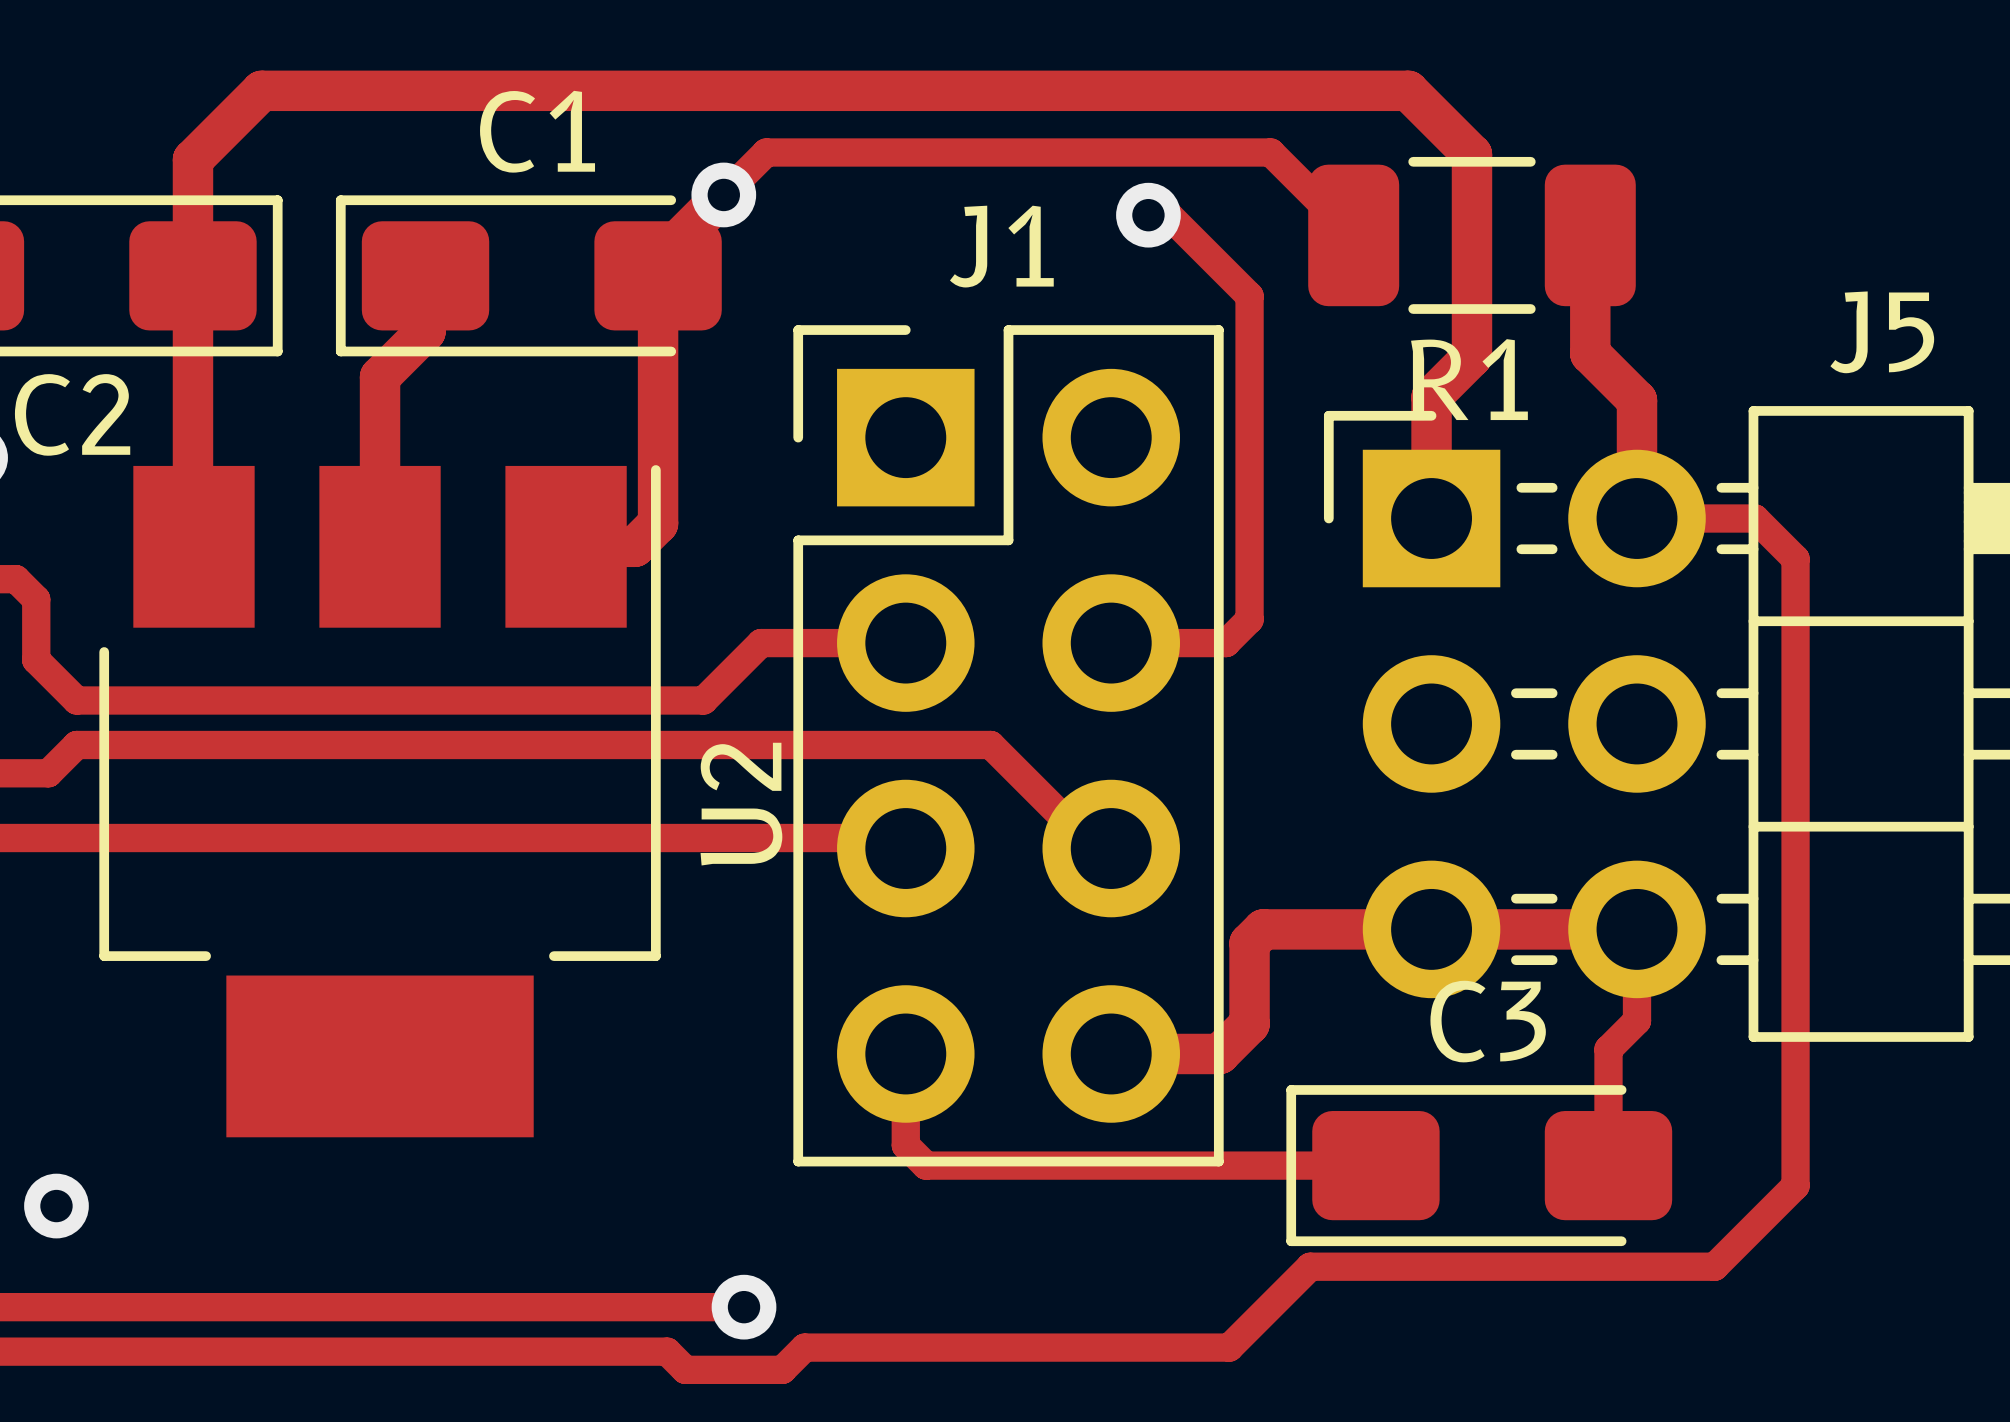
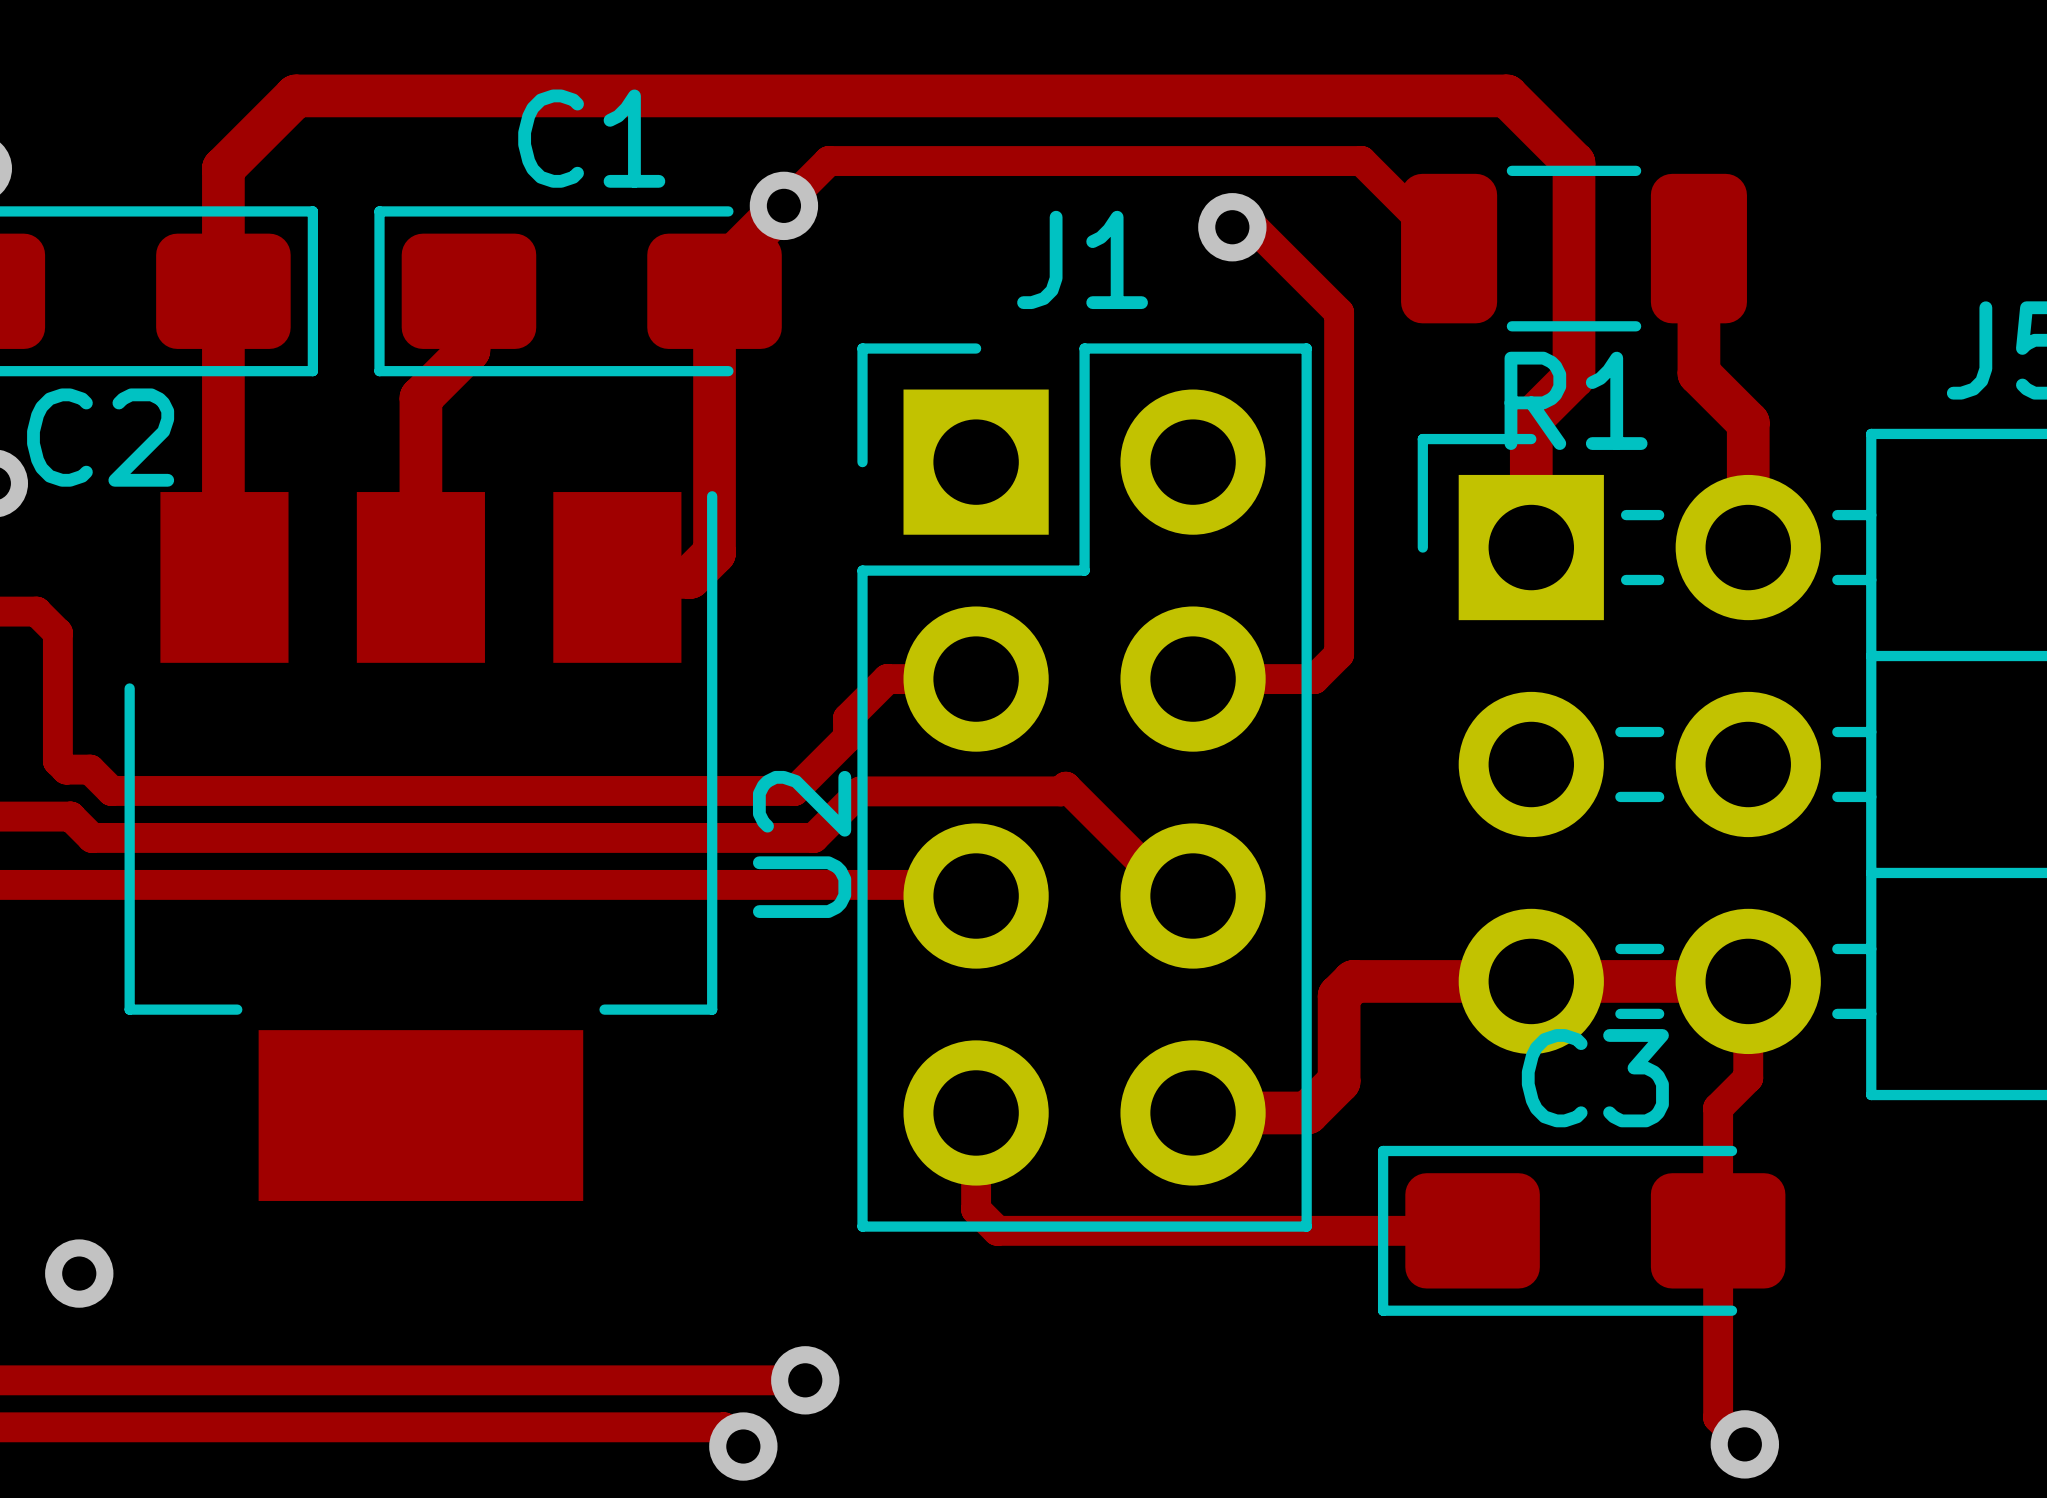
track: (1637, 518) (1755, 518) (1795, 558) (1795, 1185) (1714, 1266) (1310, 1266) (1229, 1347) (804, 1347) (782, 1369) (685, 1369) -> none
track: (821, 643) (761, 643) (703, 700) (76, 700) (36, 660) -> (887, 679) (847, 718) (847, 737) (794, 790) (111, 790) (90, 769) (66, 769) (57, 761) (57, 697)
track: (990, 744) (76, 744) (48, 773) -> (1065, 786) (1061, 791) (860, 791) (813, 837) (92, 837) (70, 816)
track: none -> (1718, 1230) (1718, 1417) (1744, 1444)
via: none -> (1744, 1444)
via: none -> (743, 1446)

